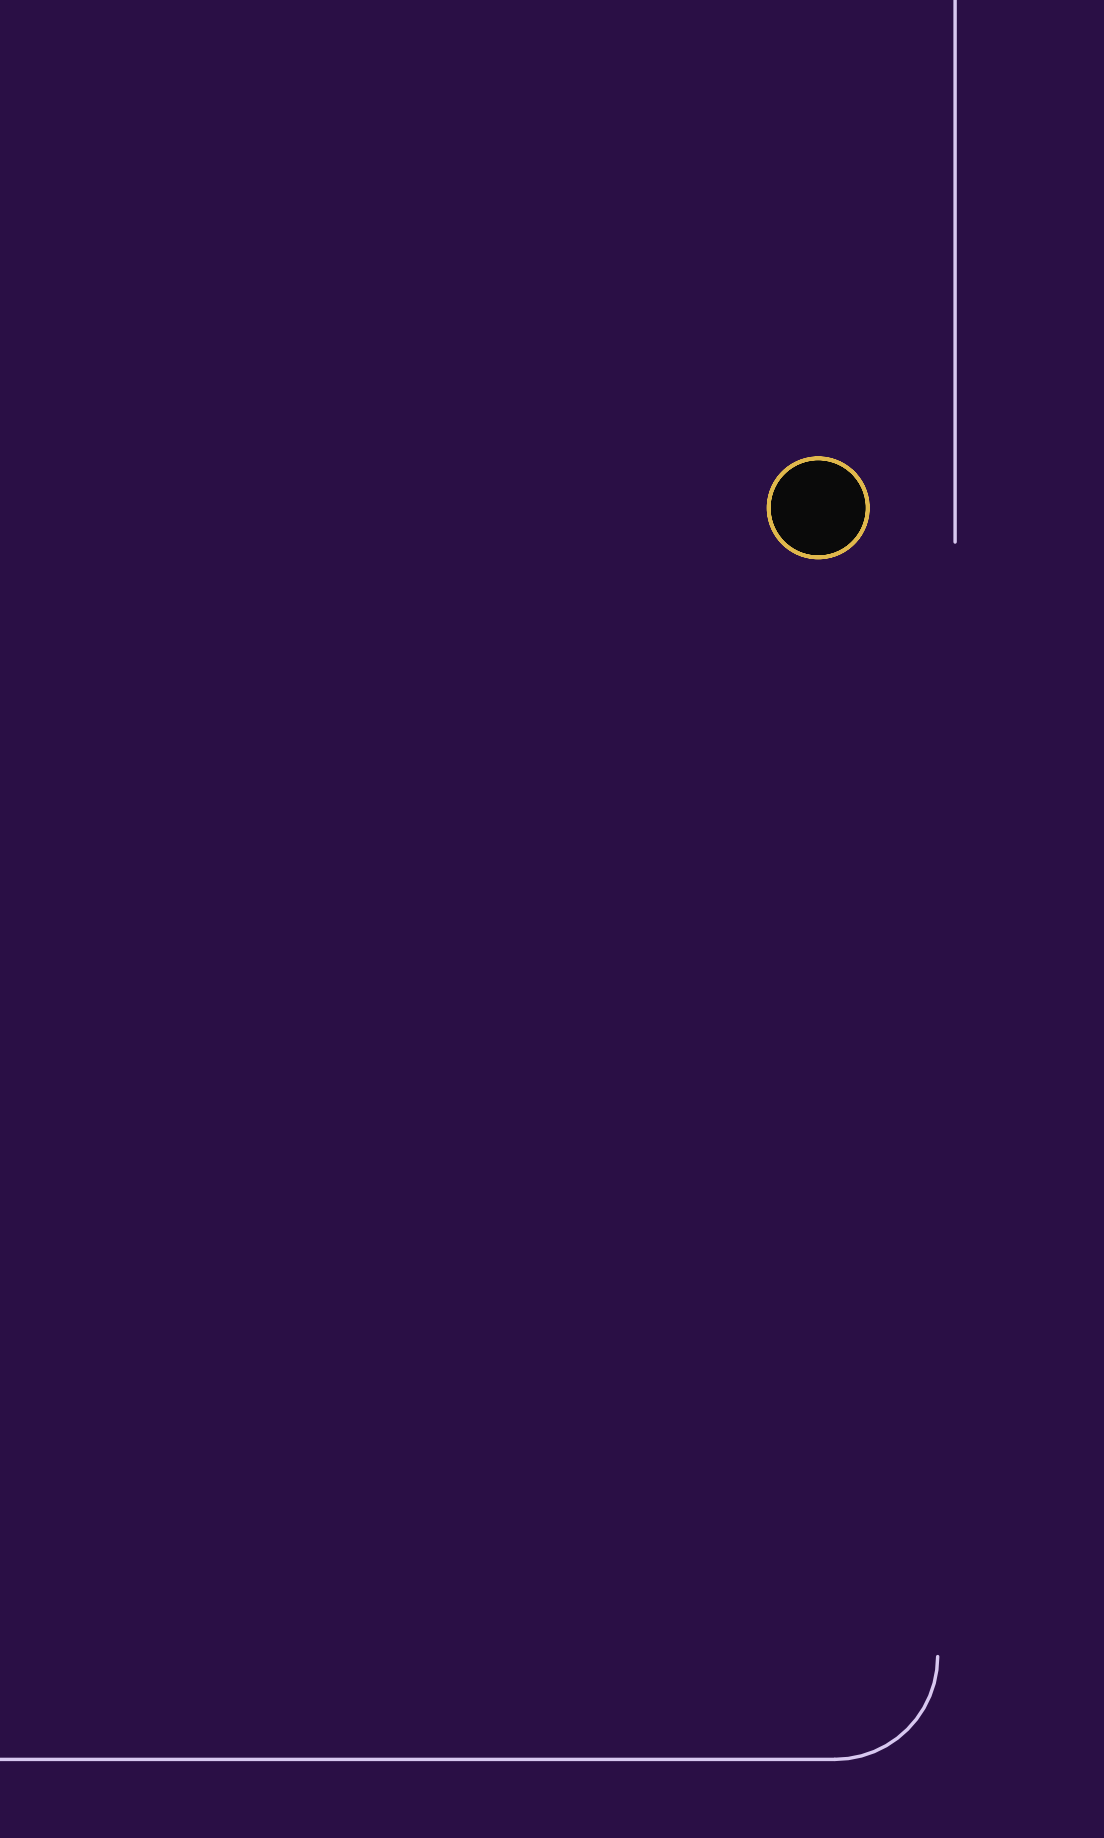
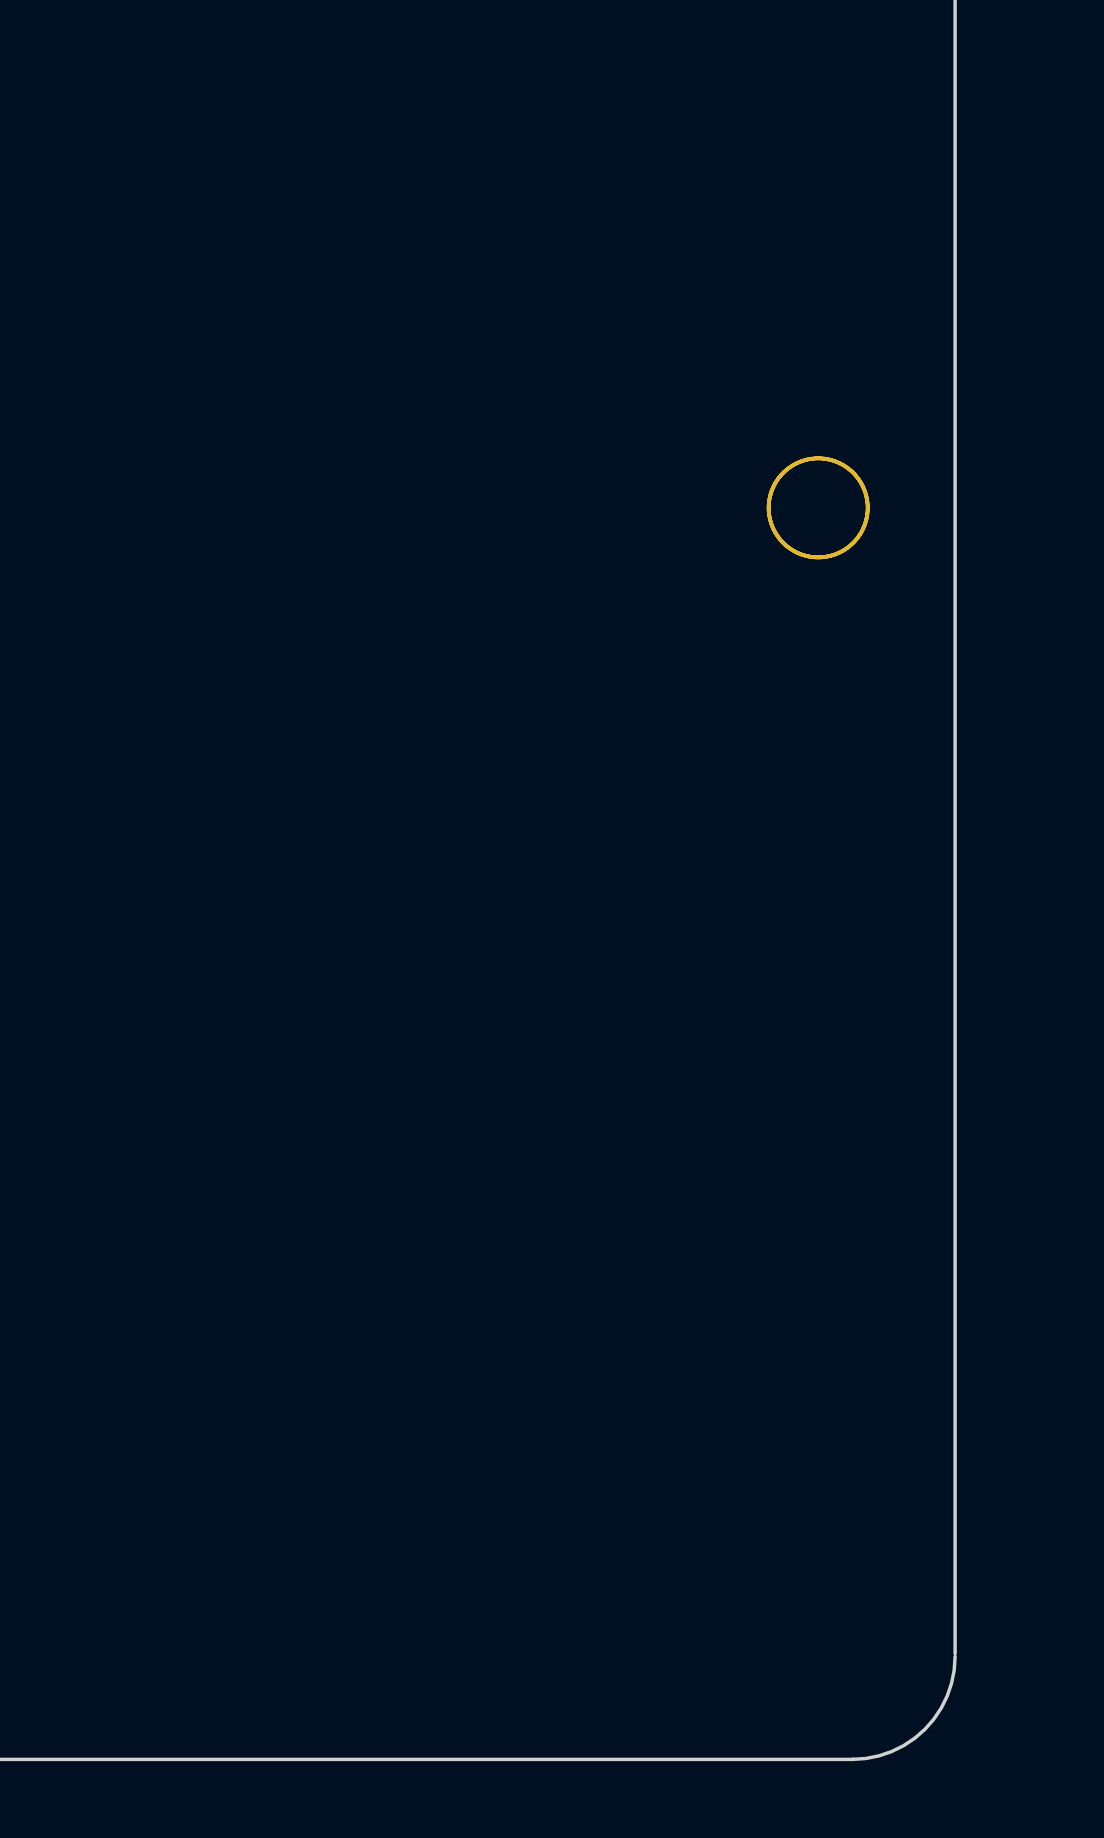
board edge: none -> (955, 542) (955, 1653)
board edge: (937, 1656) (936, 1669) (929, 1695) (916, 1719) (907, 1729) (897, 1738) (874, 1751) (848, 1758) (834, 1759) -> (853, 1759) (834, 1759)
board edge: none -> (955, 1656) (951, 1683) (947, 1695) (933, 1719) (924, 1729) (914, 1738) (891, 1751) (865, 1758) (852, 1759)

